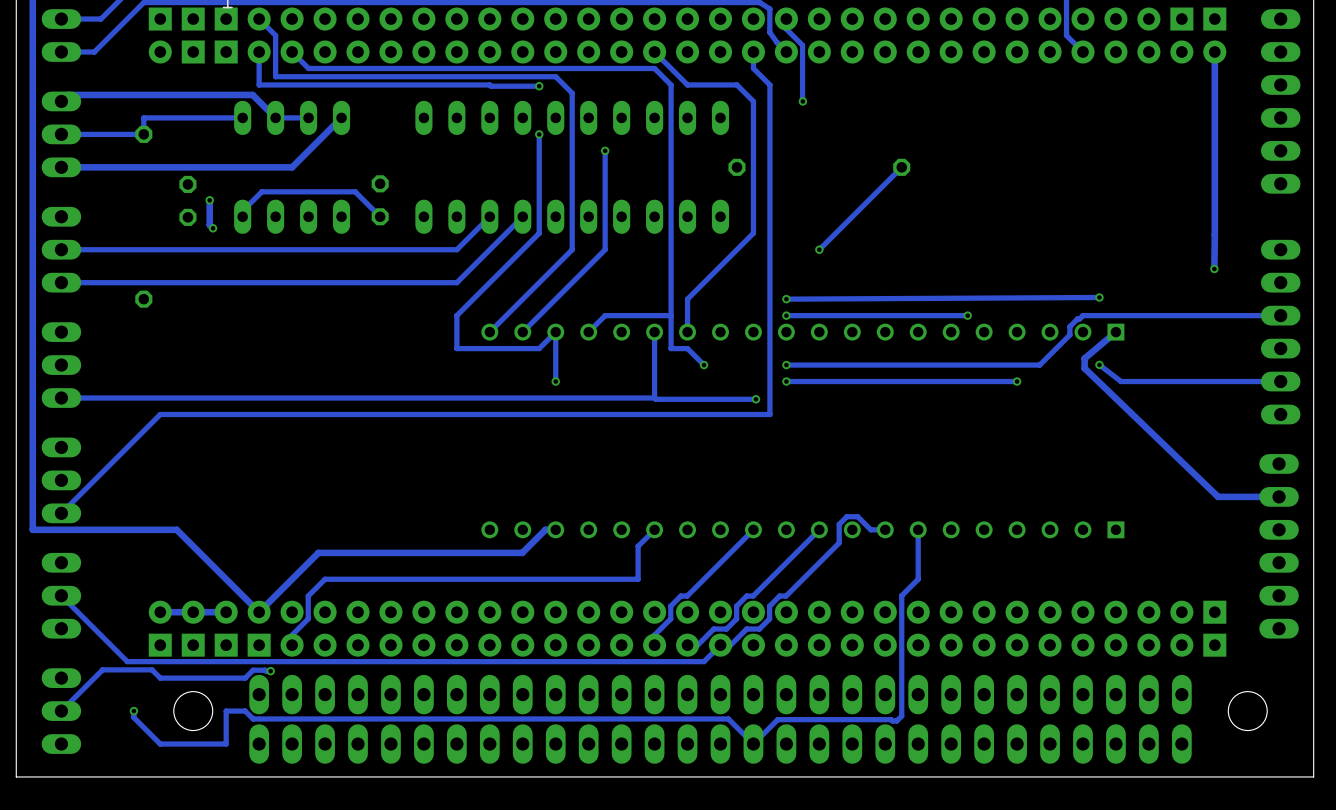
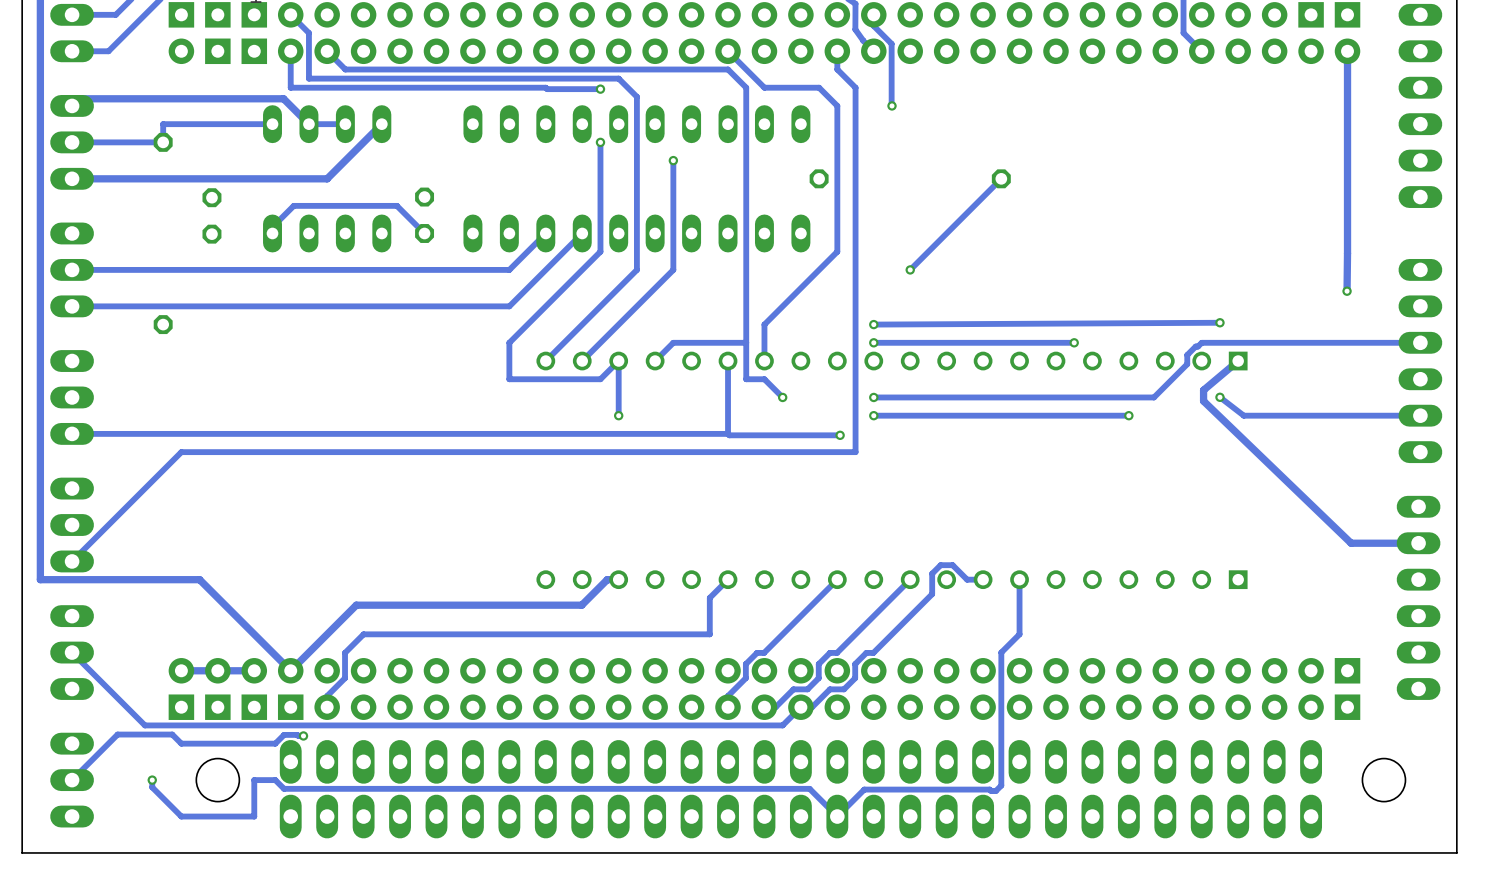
track: (209, 200) (209, 225) (213, 228) -> none
via: (209, 200) -> none
via: (213, 228) -> none

